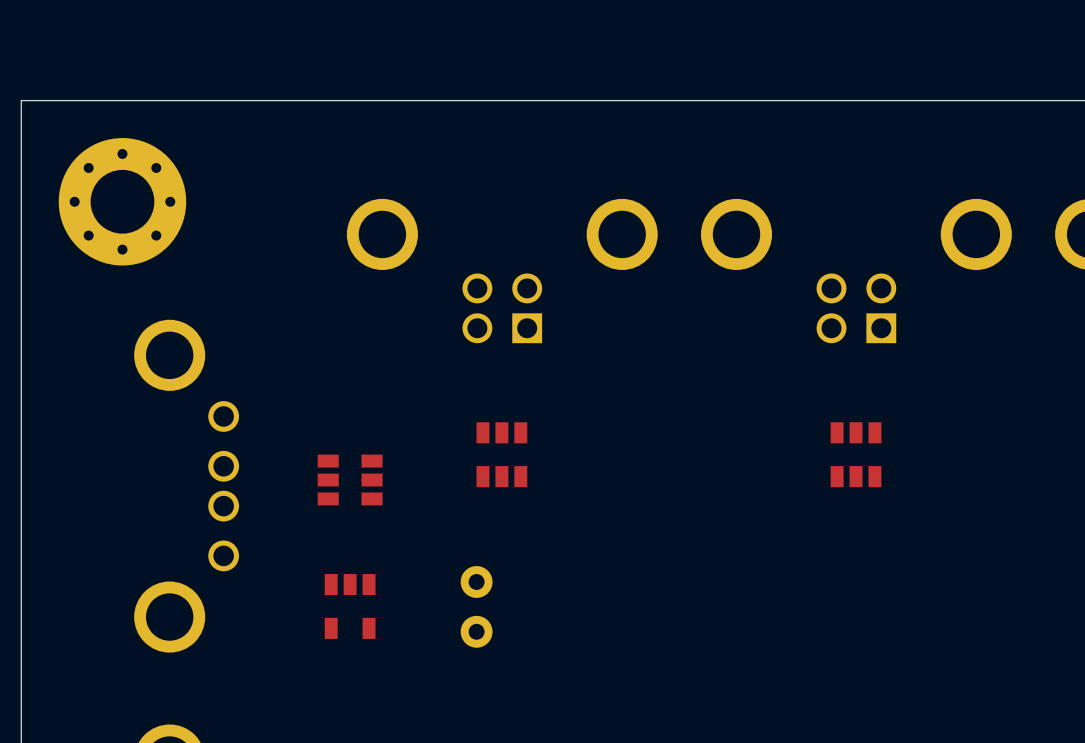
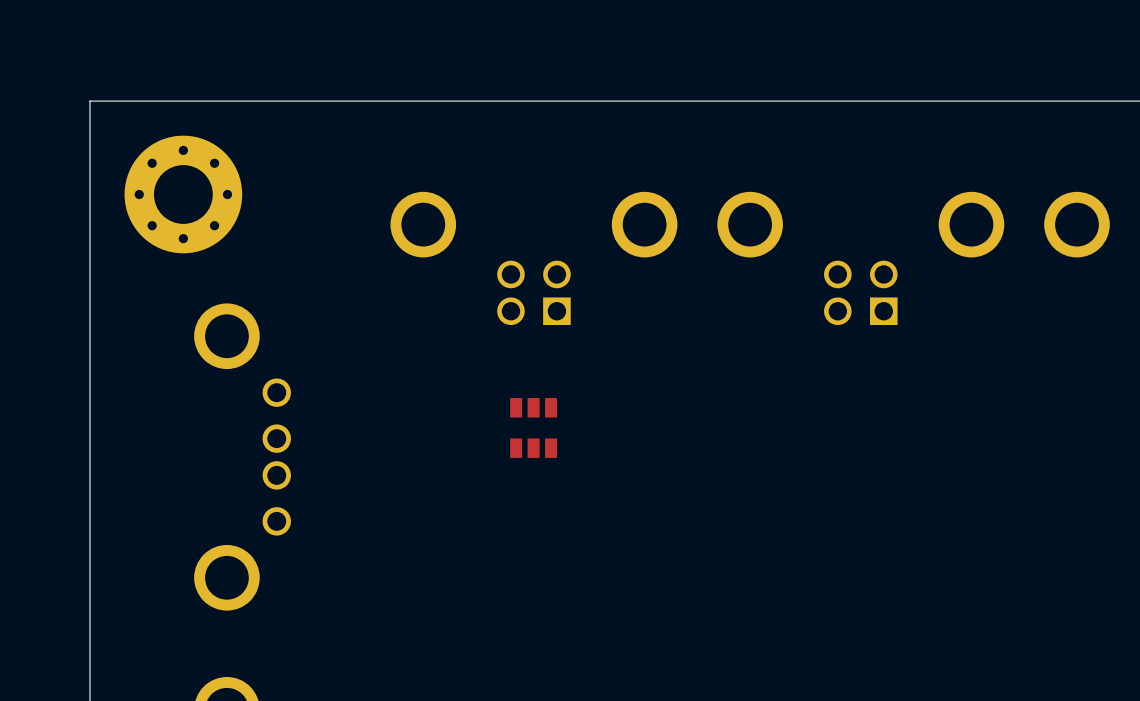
part: (856, 454) -> none
part: (350, 480) -> none
part: (350, 606) -> none
part: (476, 606) -> none

